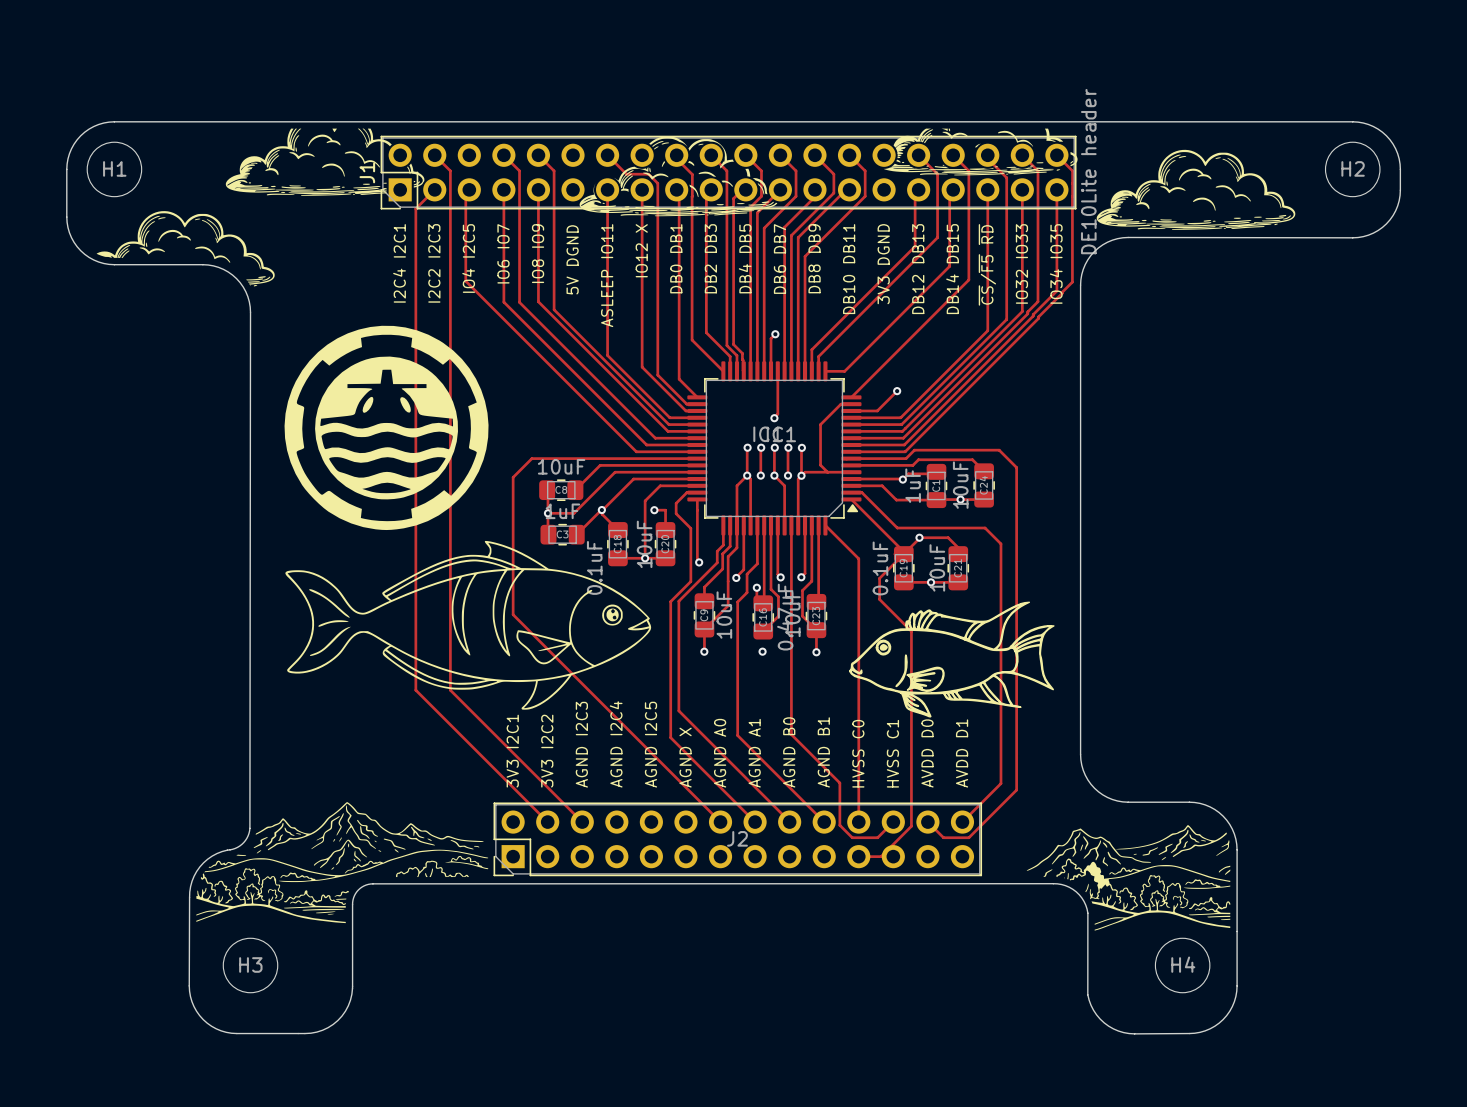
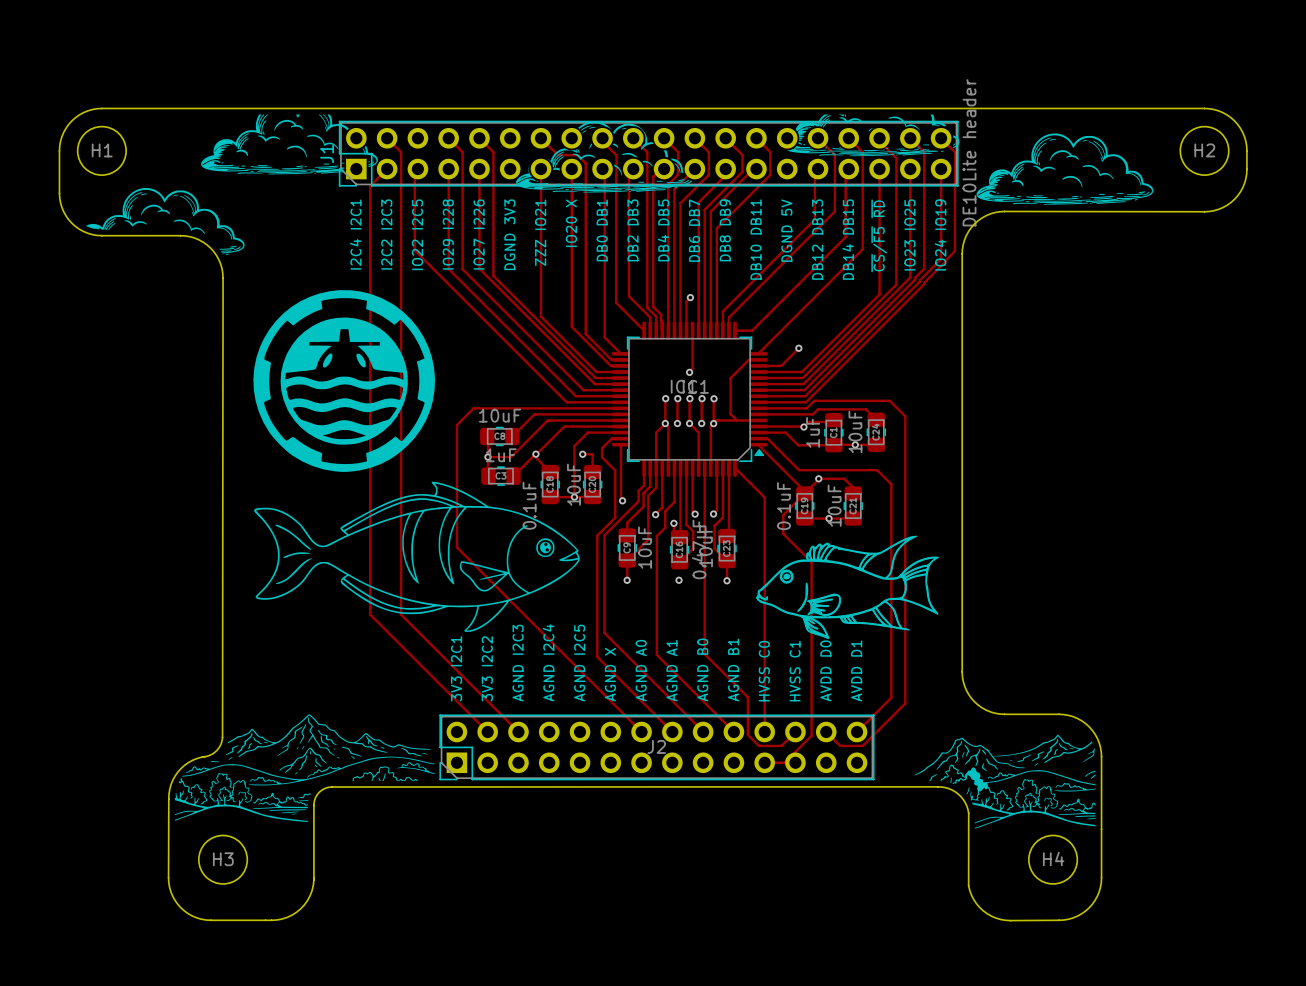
text: IO12 X (641, 250) -> IO20 X (571, 223)
text: IO6 IO7 (503, 253) -> IO29 I228 (448, 234)
text: IO8 IO9 (538, 253) -> IO27 I226 (479, 234)
text: IO4 I2C5 (468, 258) -> IO22 I2C5 (417, 234)
text: 5V DGND (572, 259) -> DGND 3V3 (509, 234)
text: none -> ZZZ IO21 (540, 232)
text: IO32 IO33 (1021, 263) -> IO23 IO25 (909, 234)
text: IO34 IO35 (1056, 263) -> IO24 IO19 (940, 234)
text: 3V3 DGND (883, 264) -> DGND 5V (786, 230)
text: ASLEEP IO11 (607, 275) -> none

